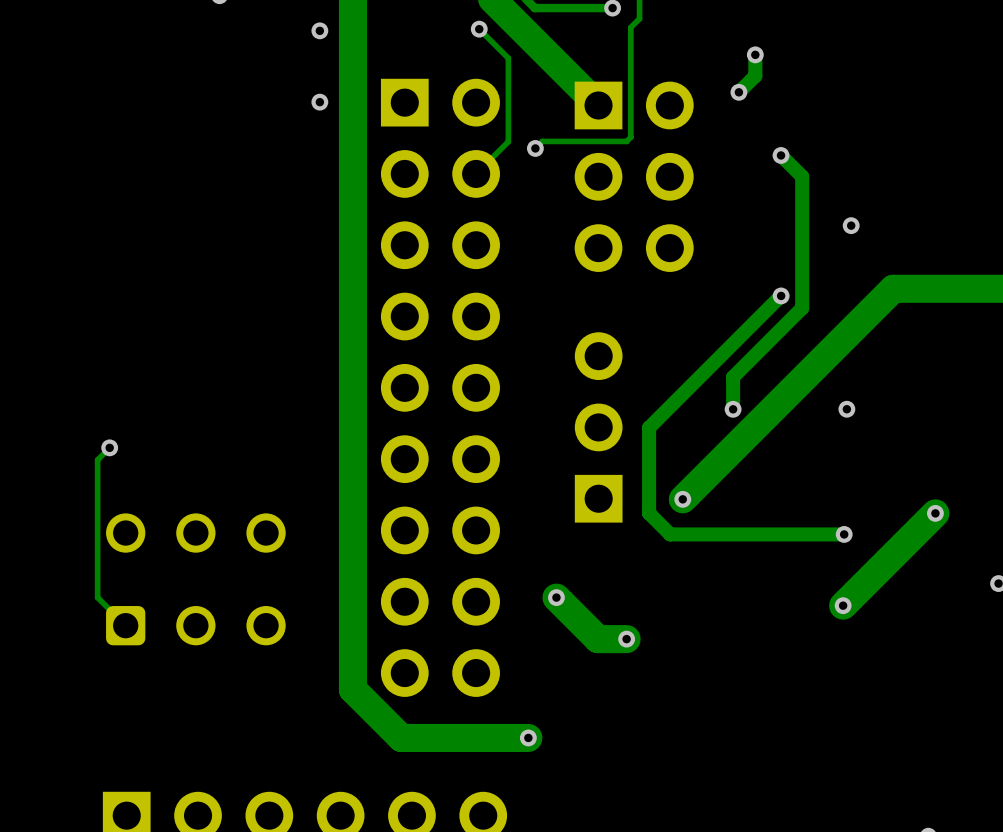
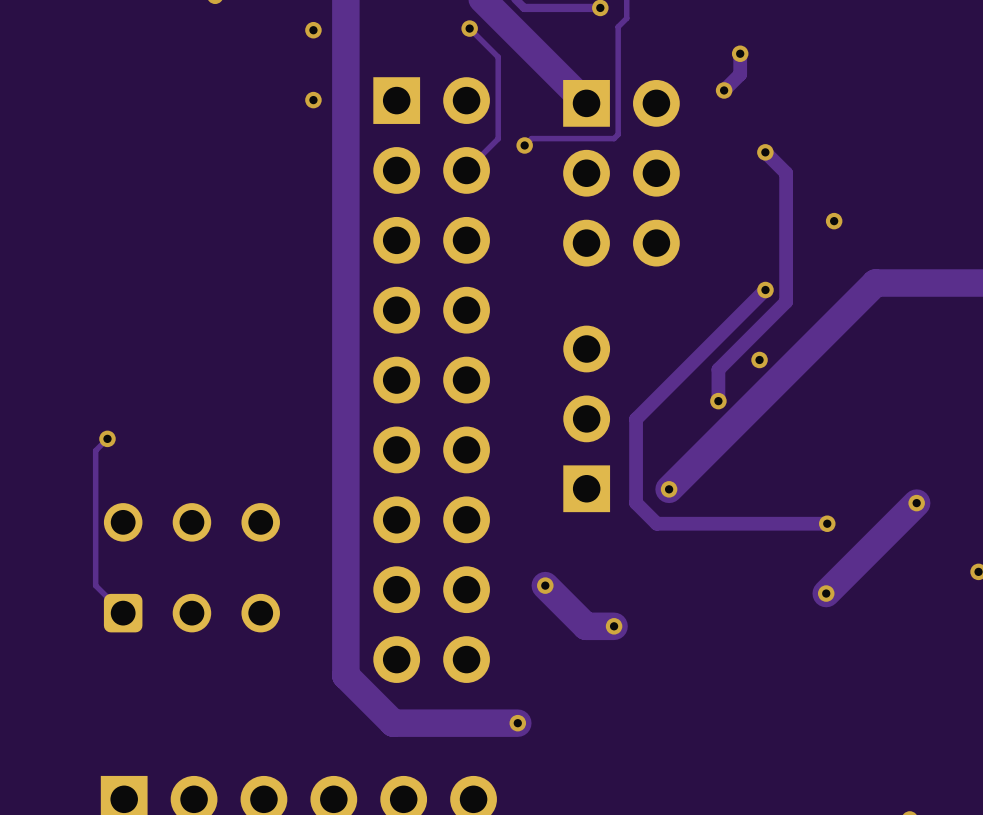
via position: (846, 409) -> (759, 359)

